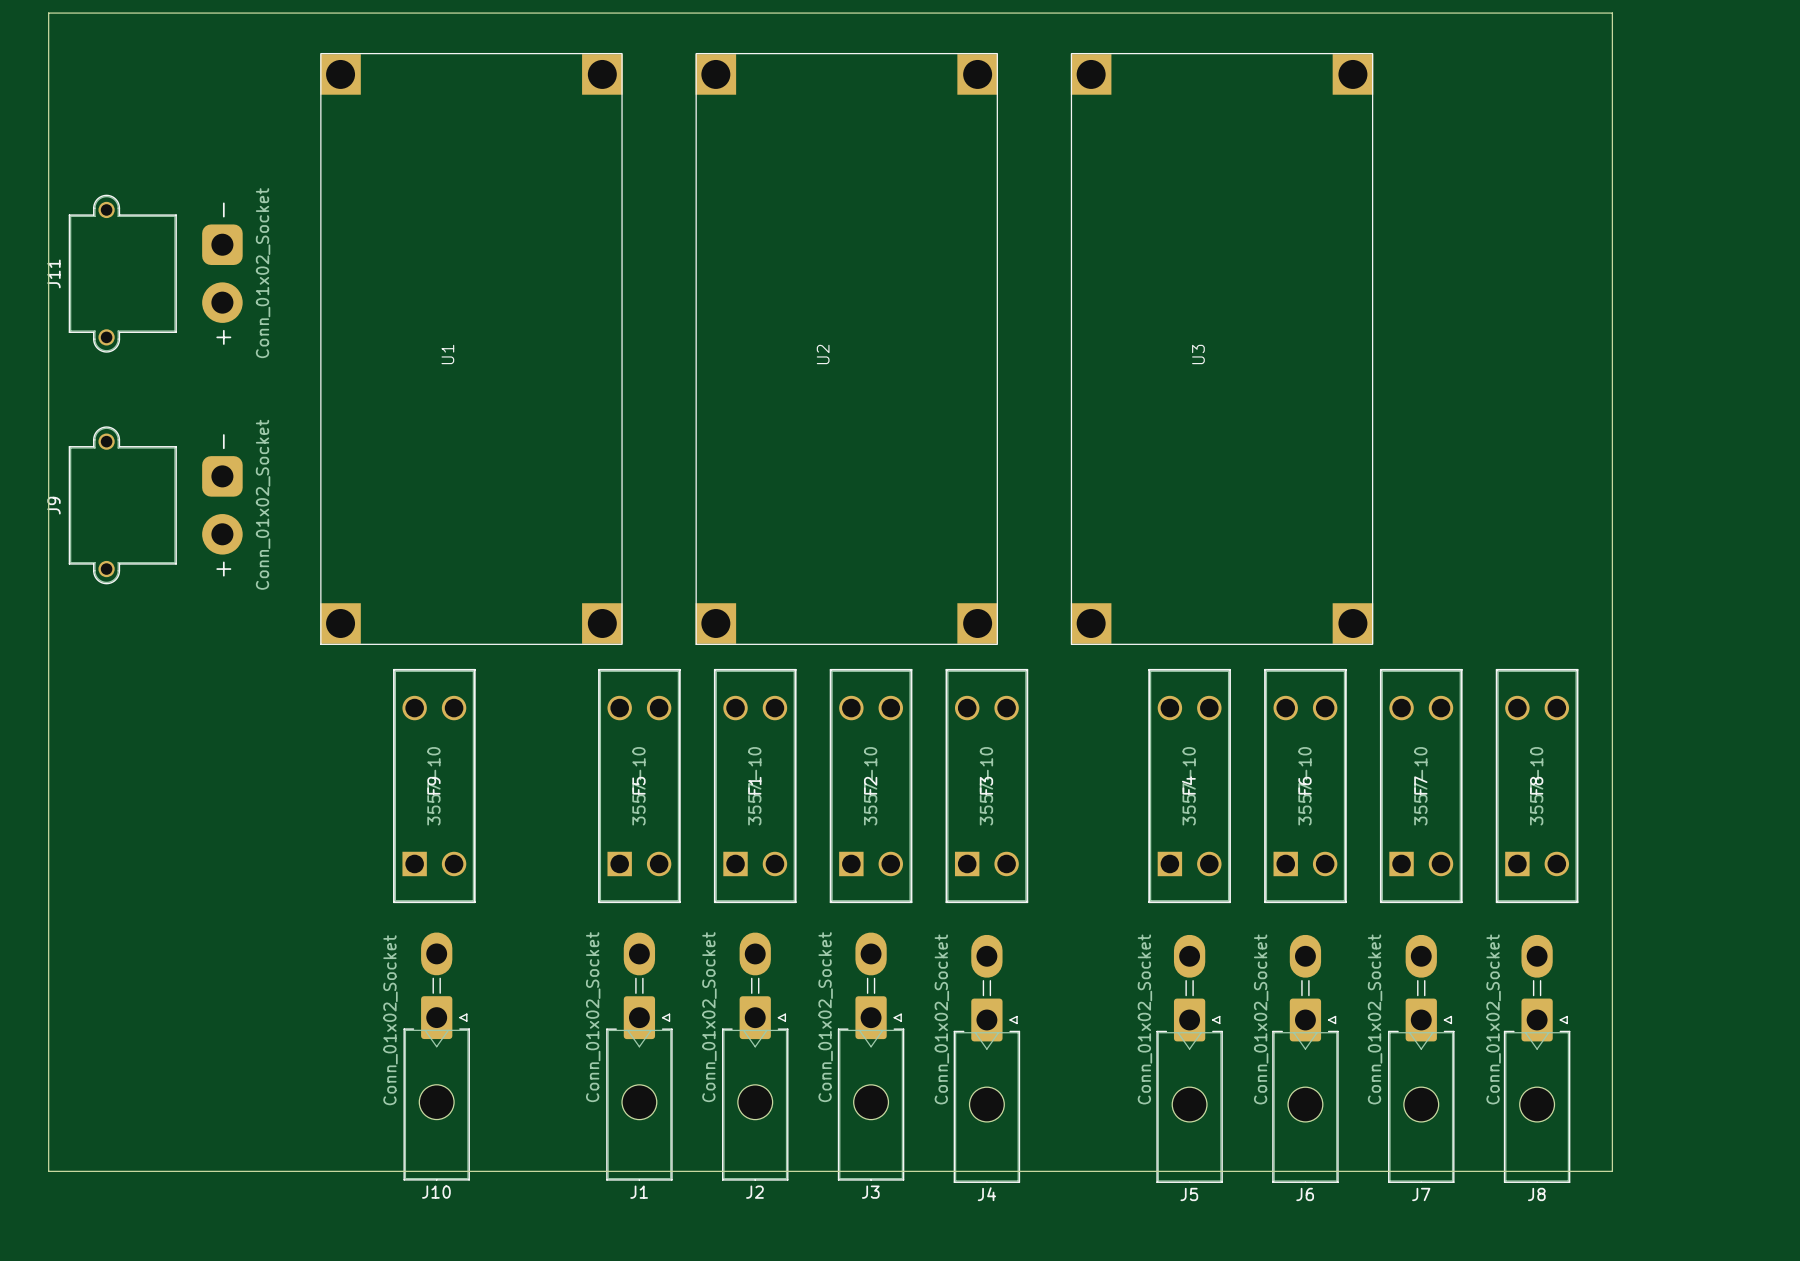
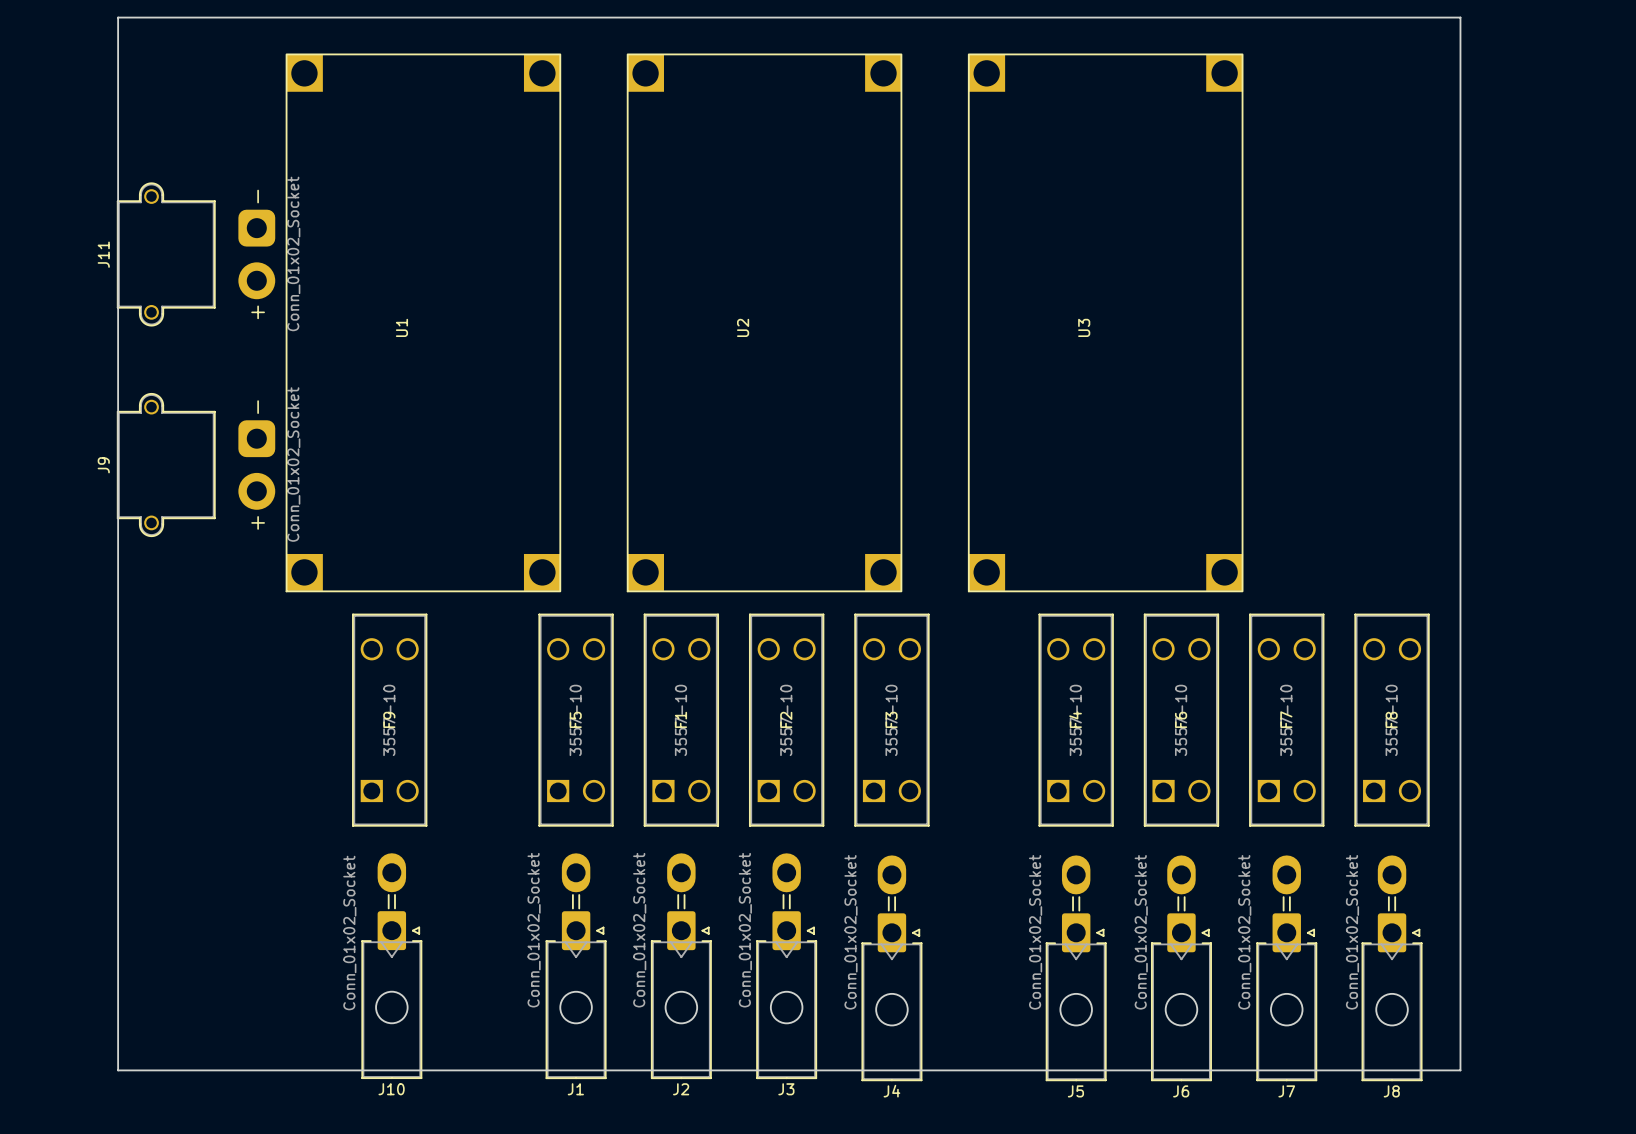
board edge: (135, 13) (48, 13) (48, 1171) (135, 1171) -> (118, 17) (118, 1070)
J11 position: (155, 273) -> (196, 254)
J9 position: (155, 505) -> (196, 465)

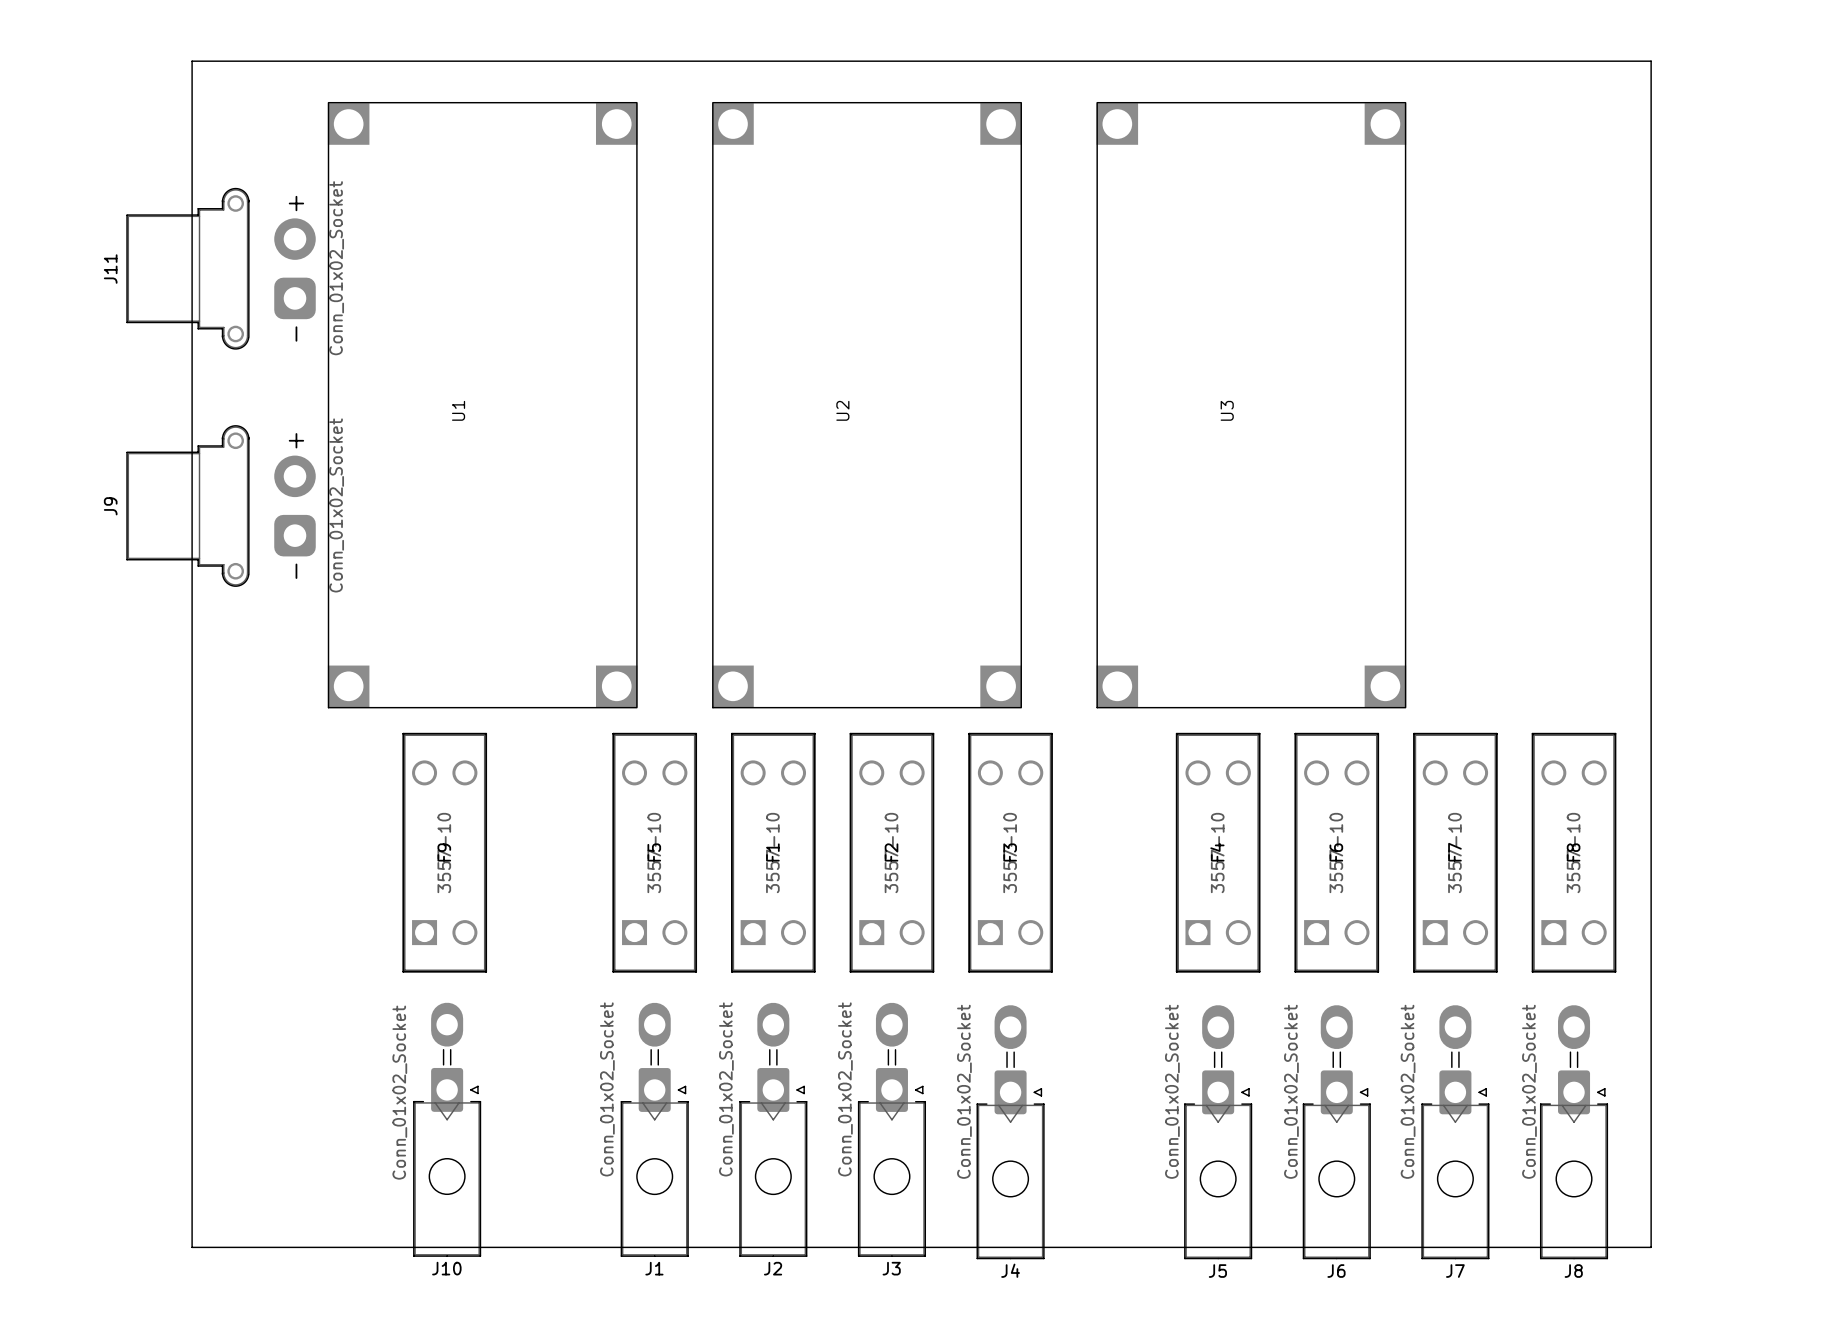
board edge: (165, 17) (118, 17) (118, 1070) (165, 1070) -> (192, 61) (192, 1247)
J11 footprint: [117, 182, 276, 327] -> [126, 187, 316, 350]
J9 footprint: [117, 393, 276, 537] -> [126, 425, 316, 587]

